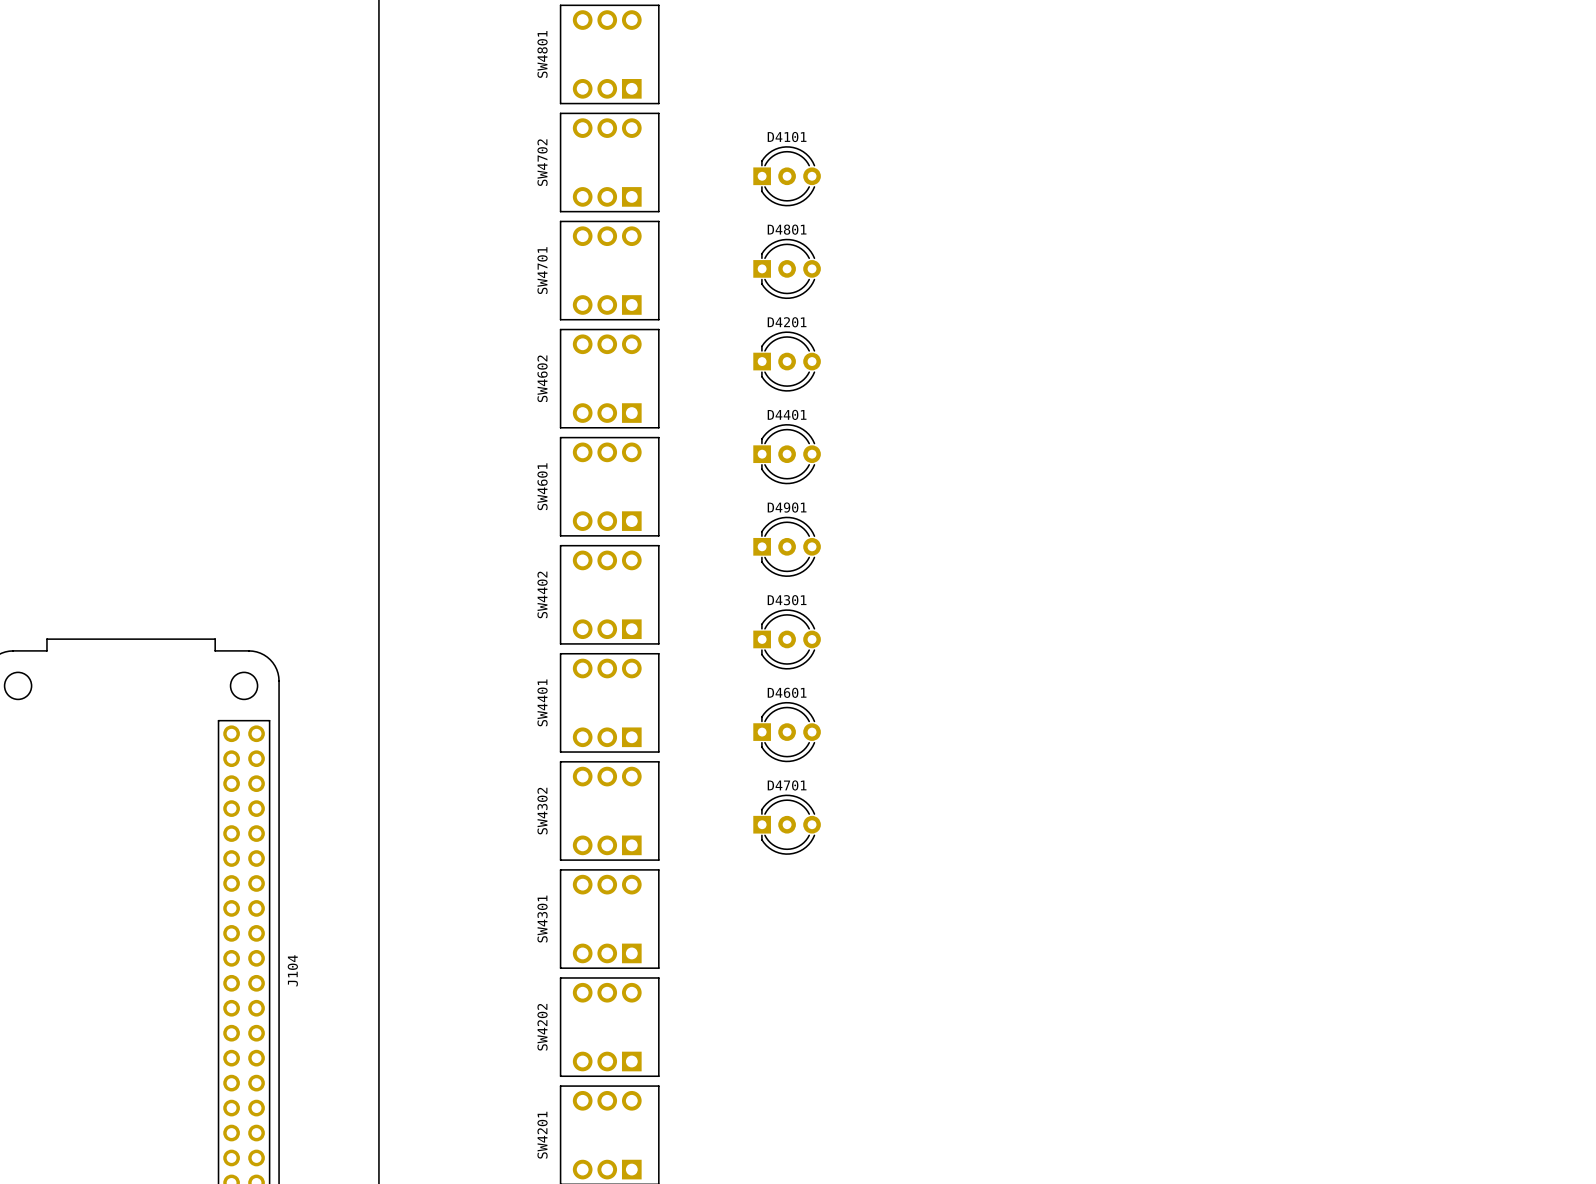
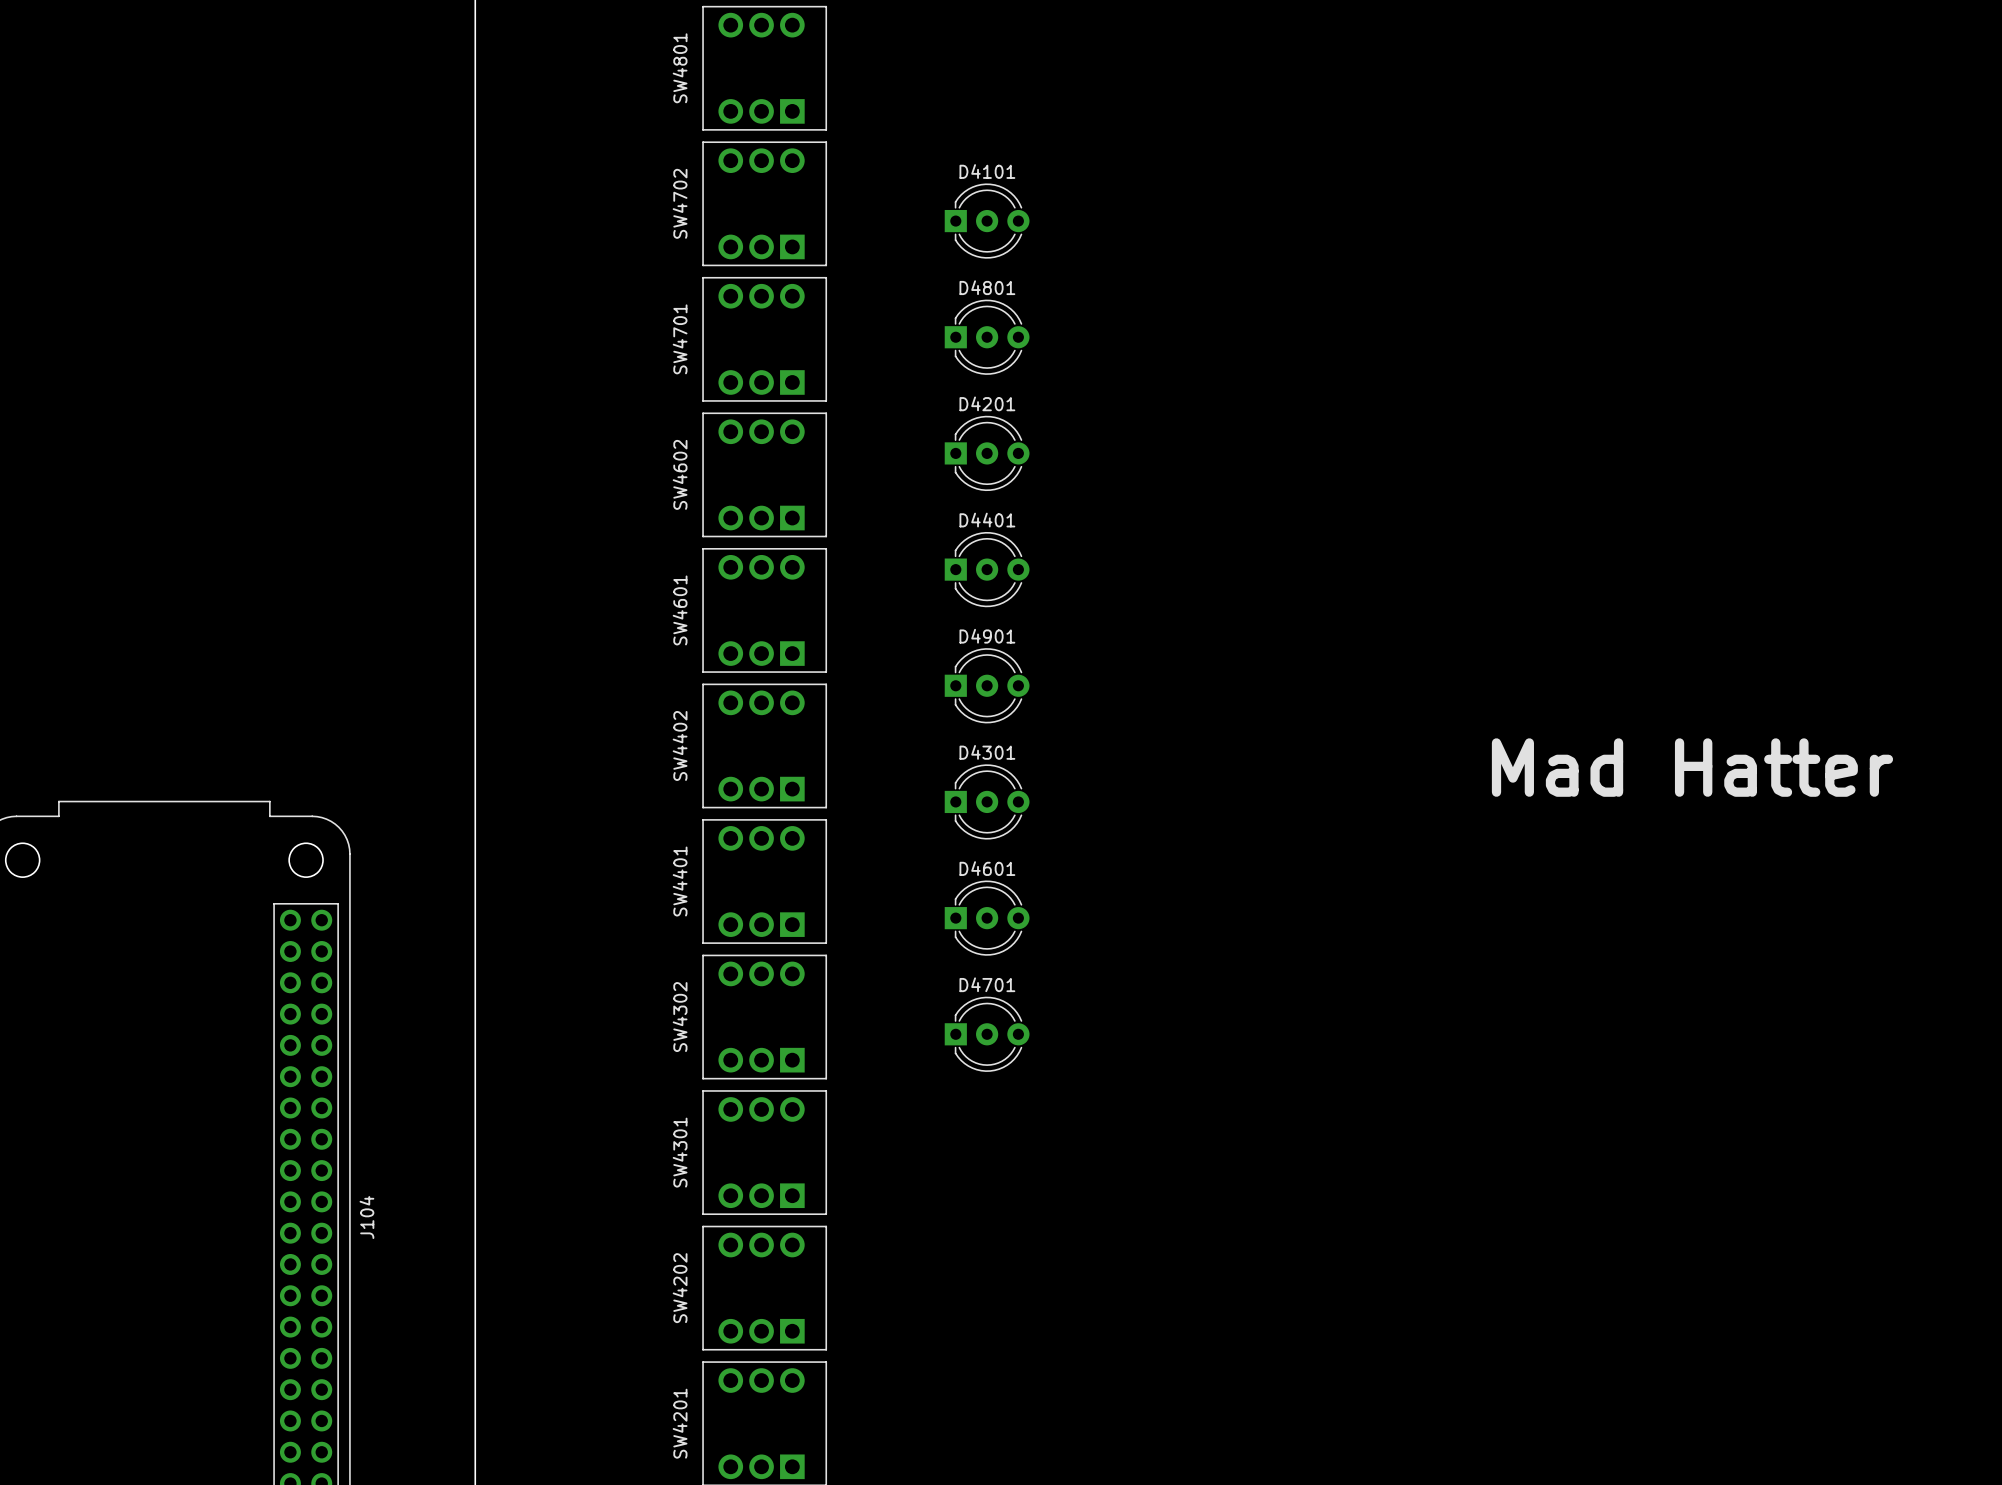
text: none -> Mad Hatter (1692, 767)

